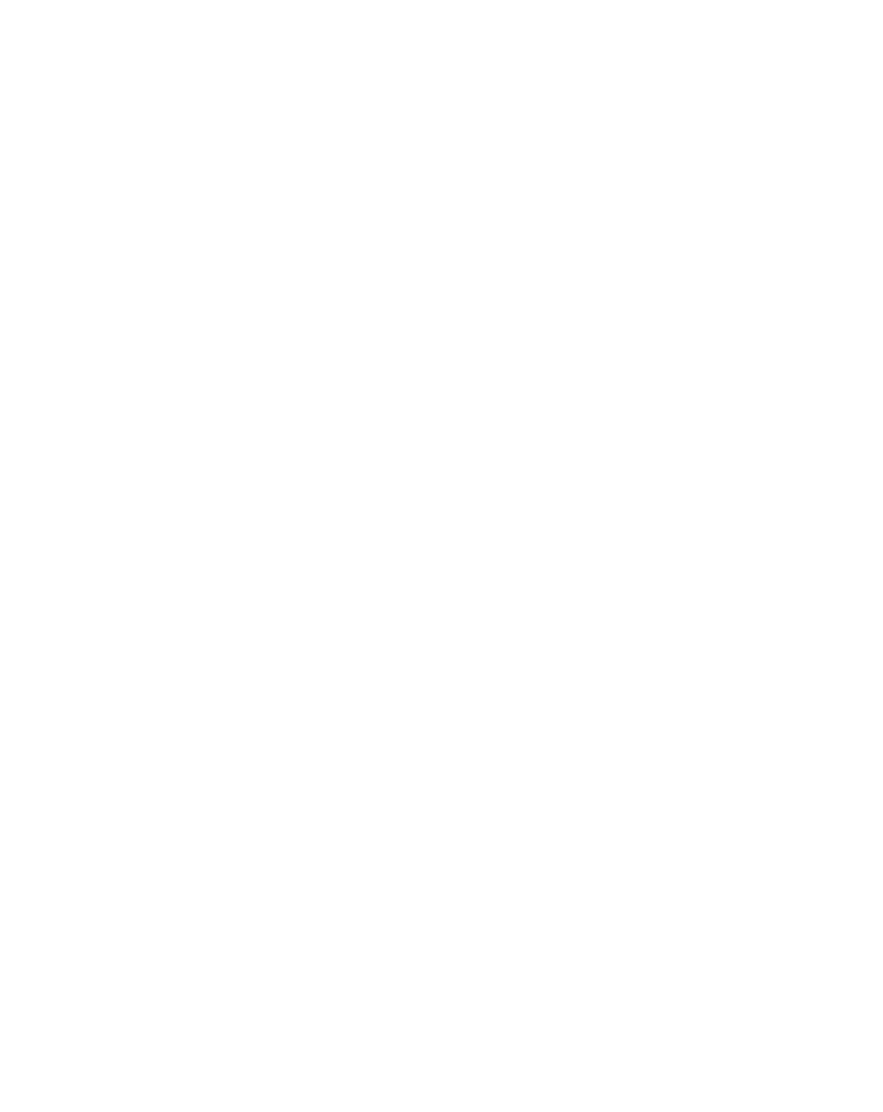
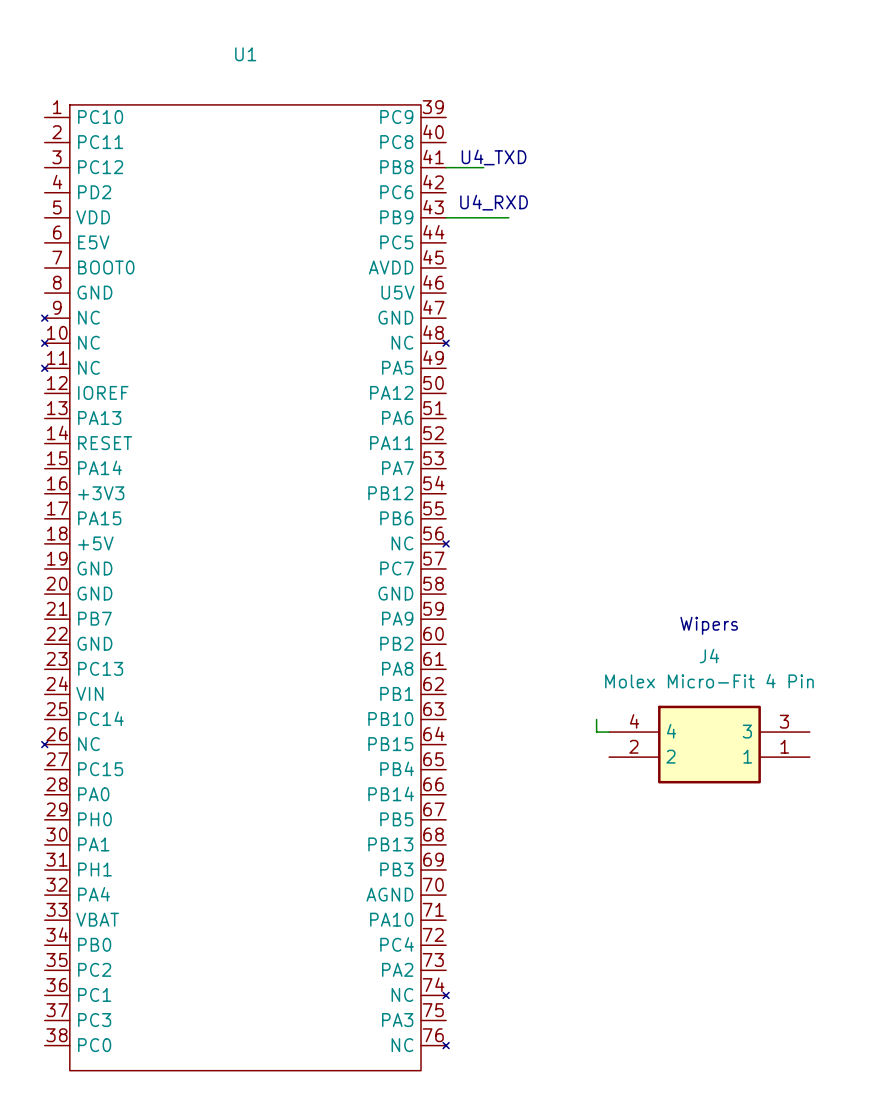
text: none -> U4_TXD (494, 157)
wire: none -> (446, 167) (483, 167)
text: none -> U4_RXD (494, 202)
wire: none -> (446, 217) (508, 217)
U1: none -> (245, 587)
text: none -> Wipers (709, 625)
wire: none -> (596, 719) (596, 732) (609, 732)
J4: none -> Molex Micro-Fit 4 Pin (709, 744)

